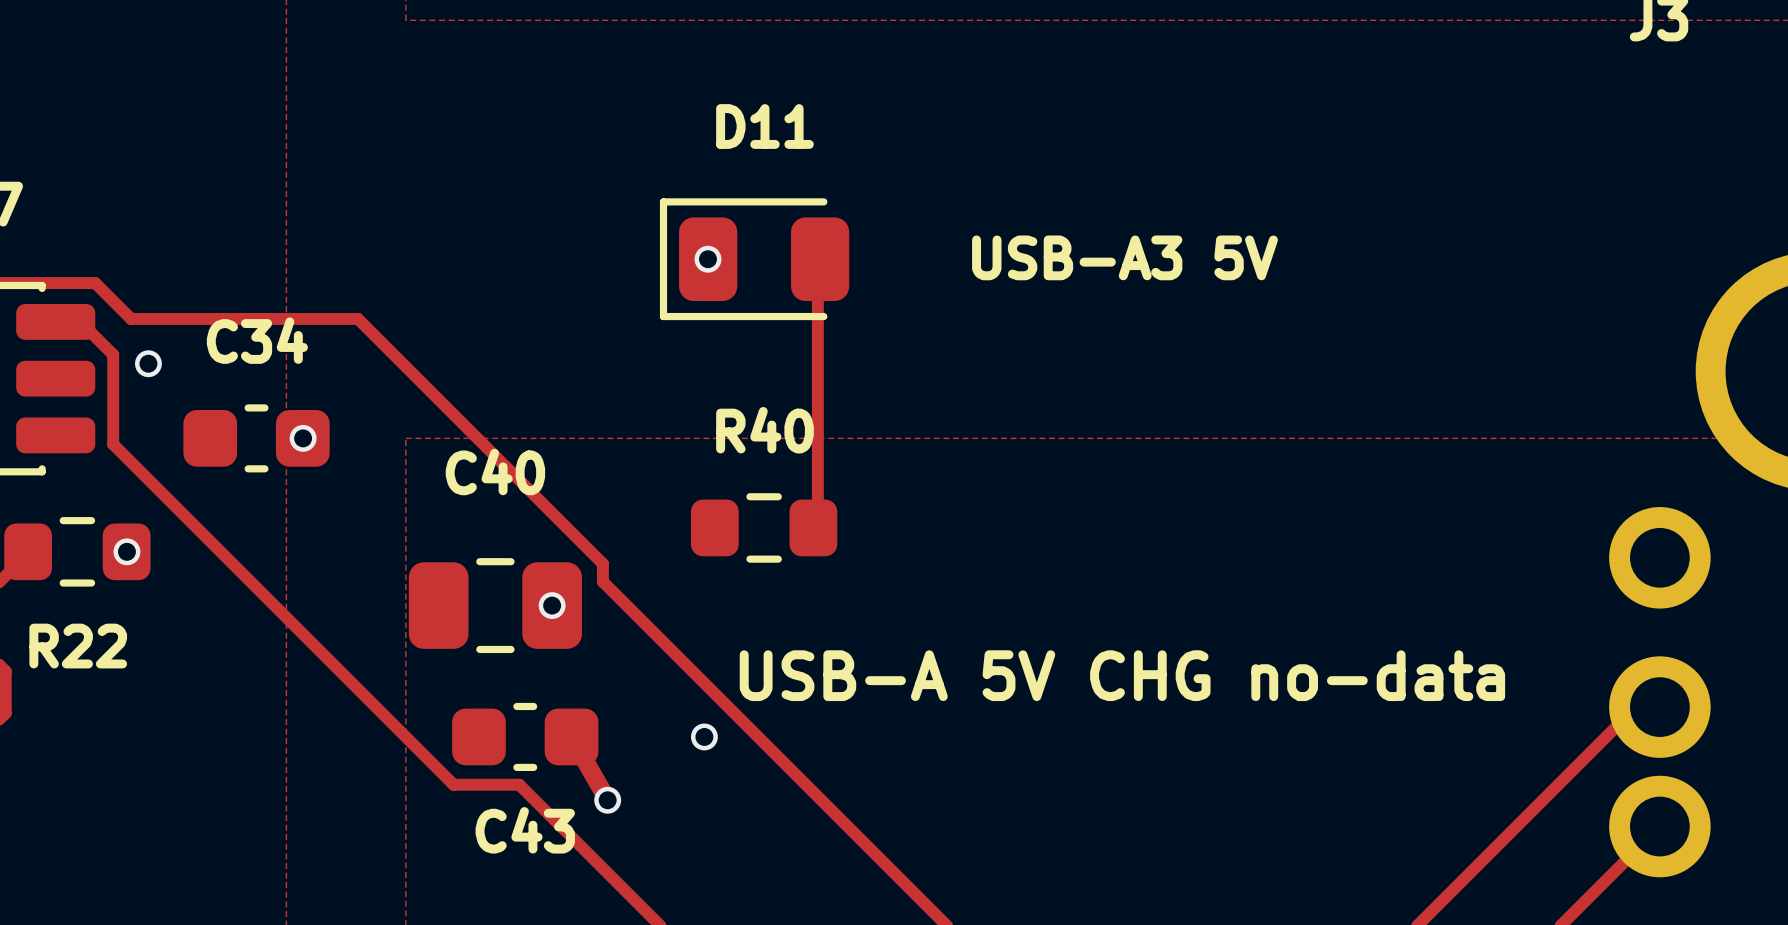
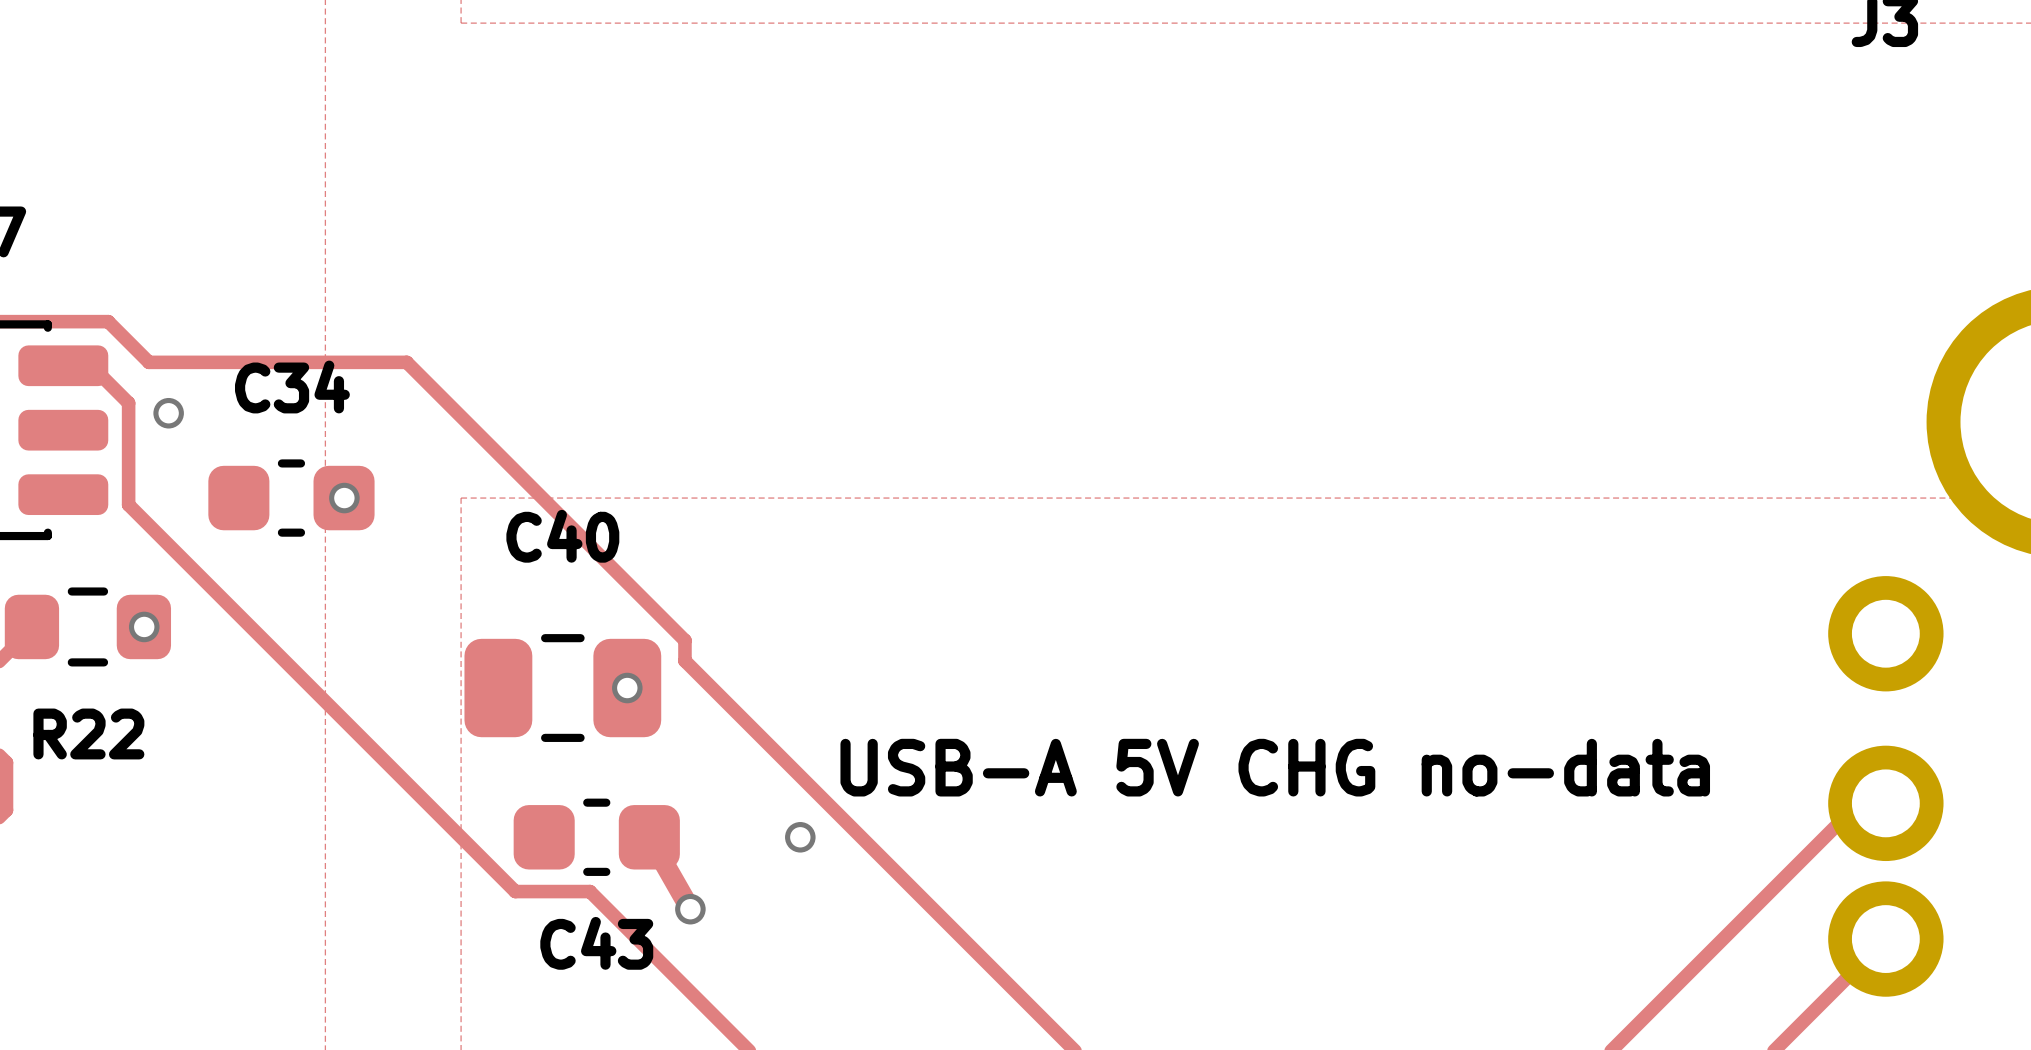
text: USB-A3 5V (1124, 257) -> none
via: (707, 259) -> none
D11: (754, 259) -> none
track: (820, 259) (817, 259) (817, 521) (813, 527) -> none
R40: (764, 527) -> none

